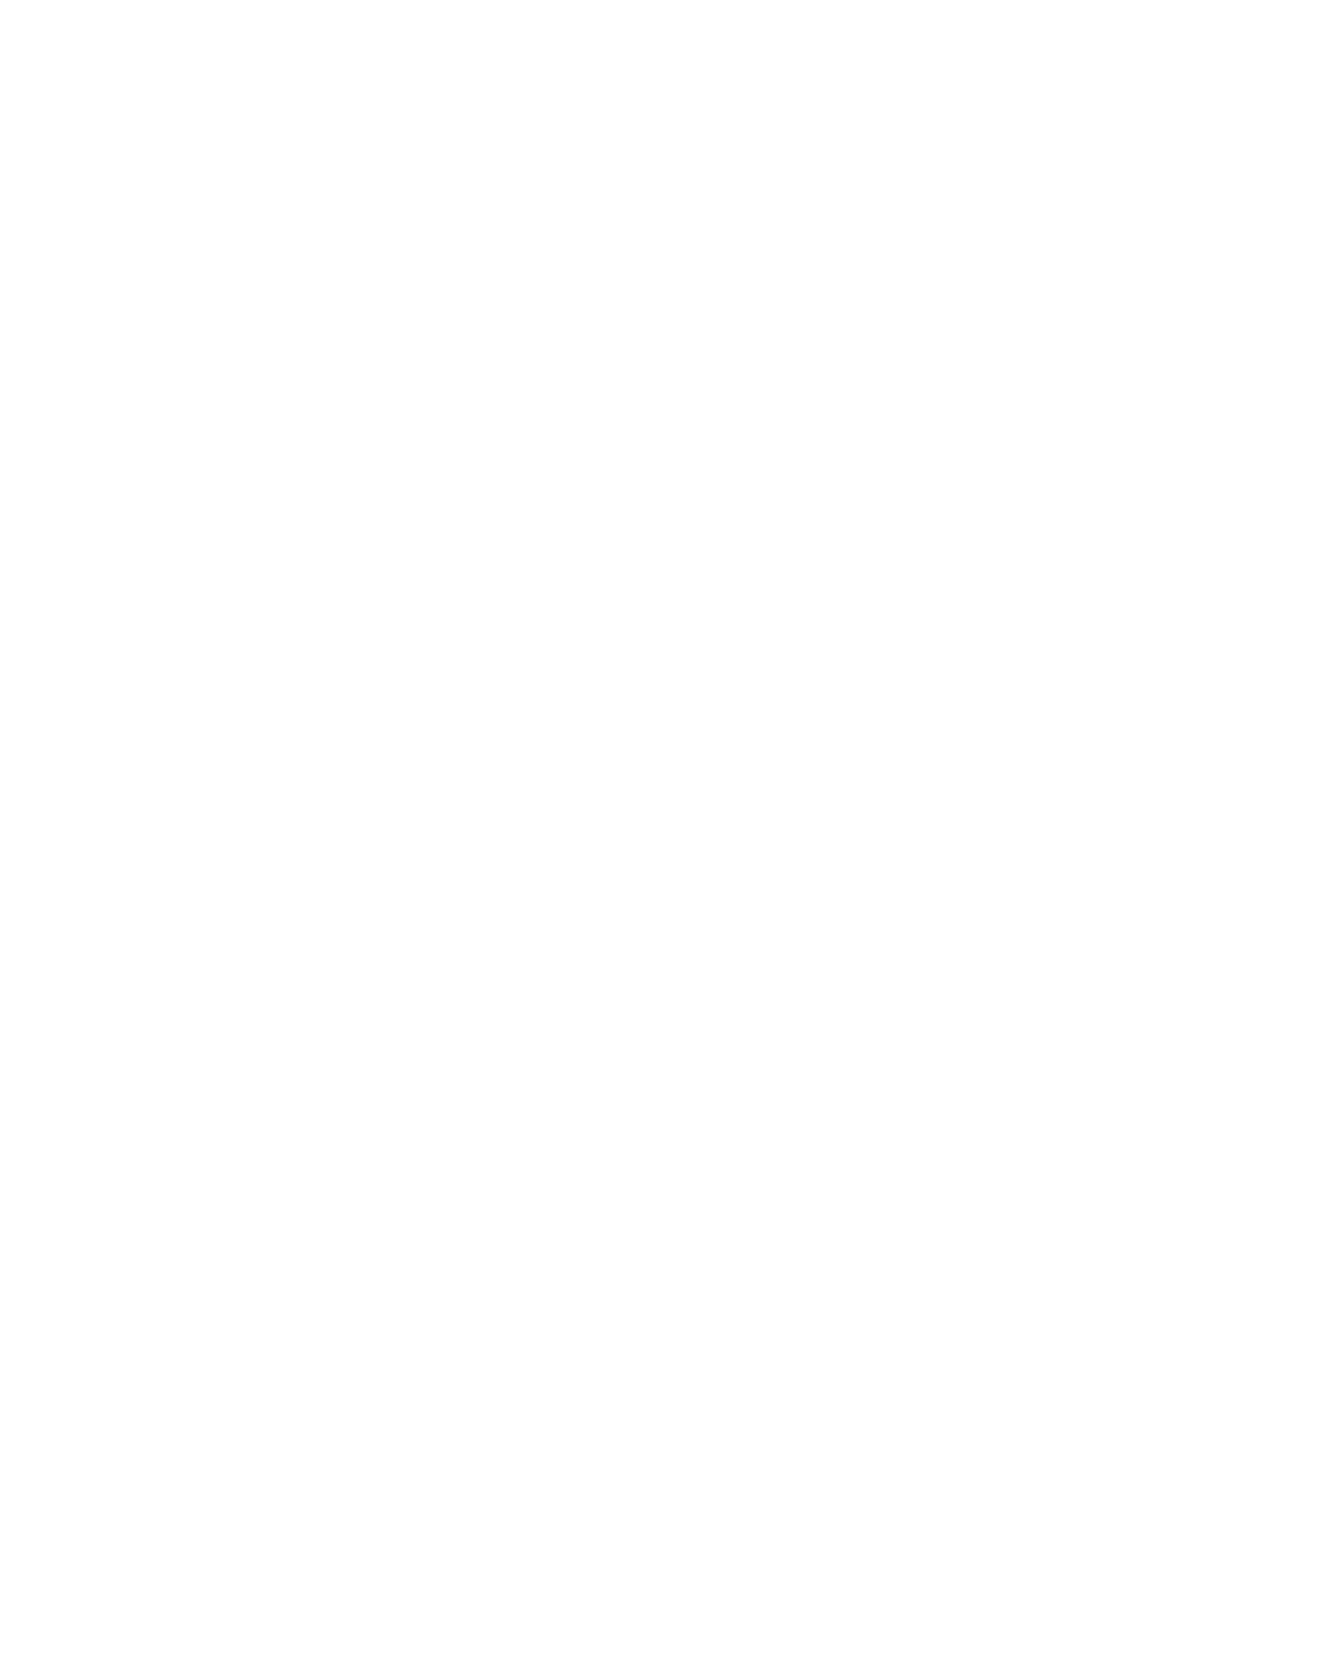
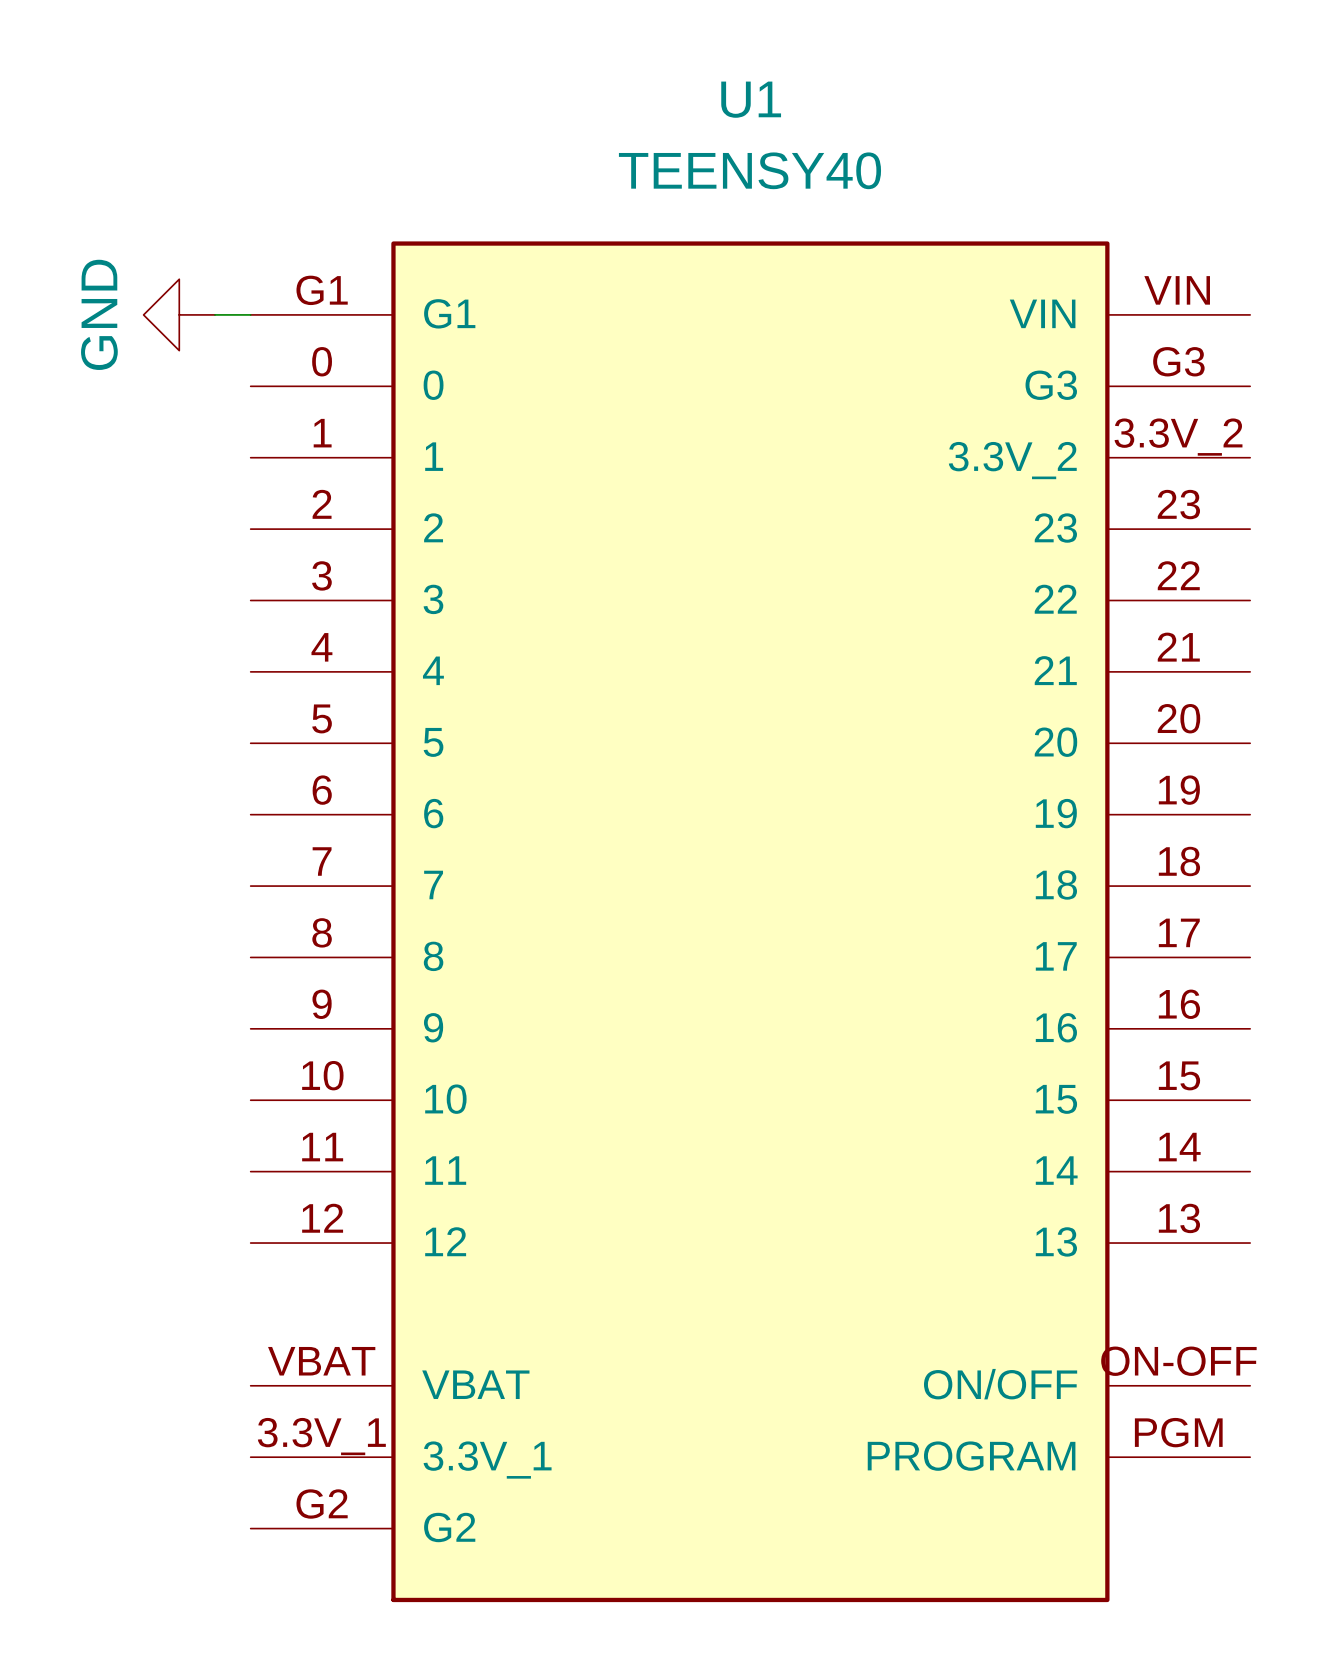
power symbol: none -> GND (179, 314)
wire: none -> (214, 314) (250, 314)
U1: none -> TEENSY40 (750, 921)

